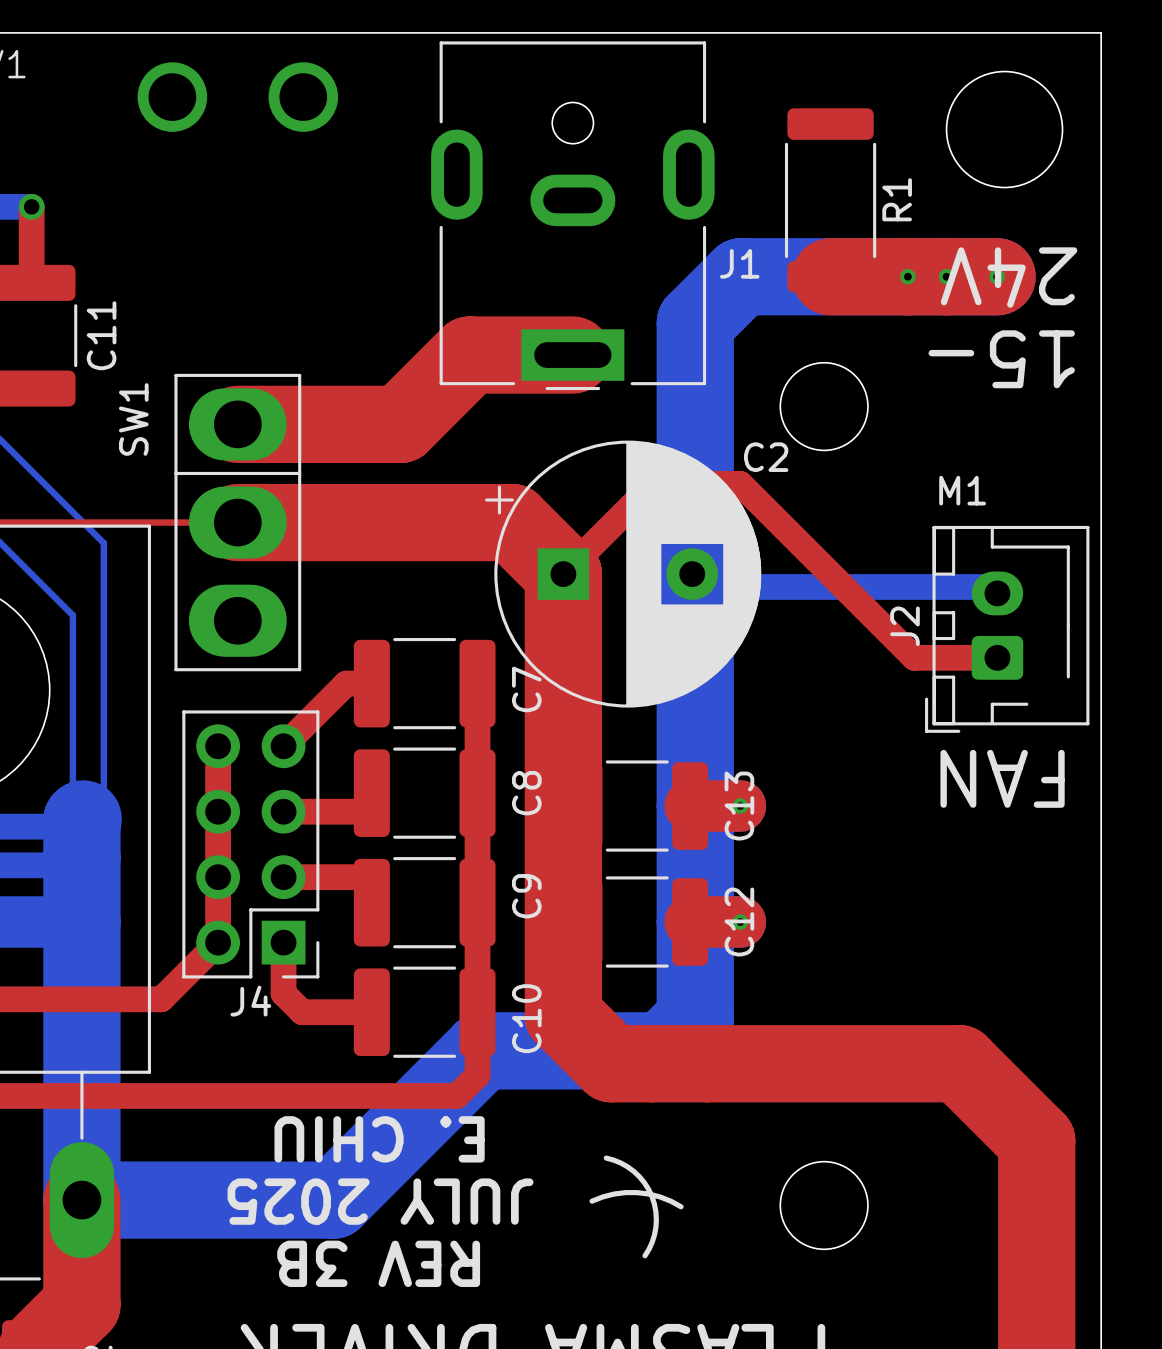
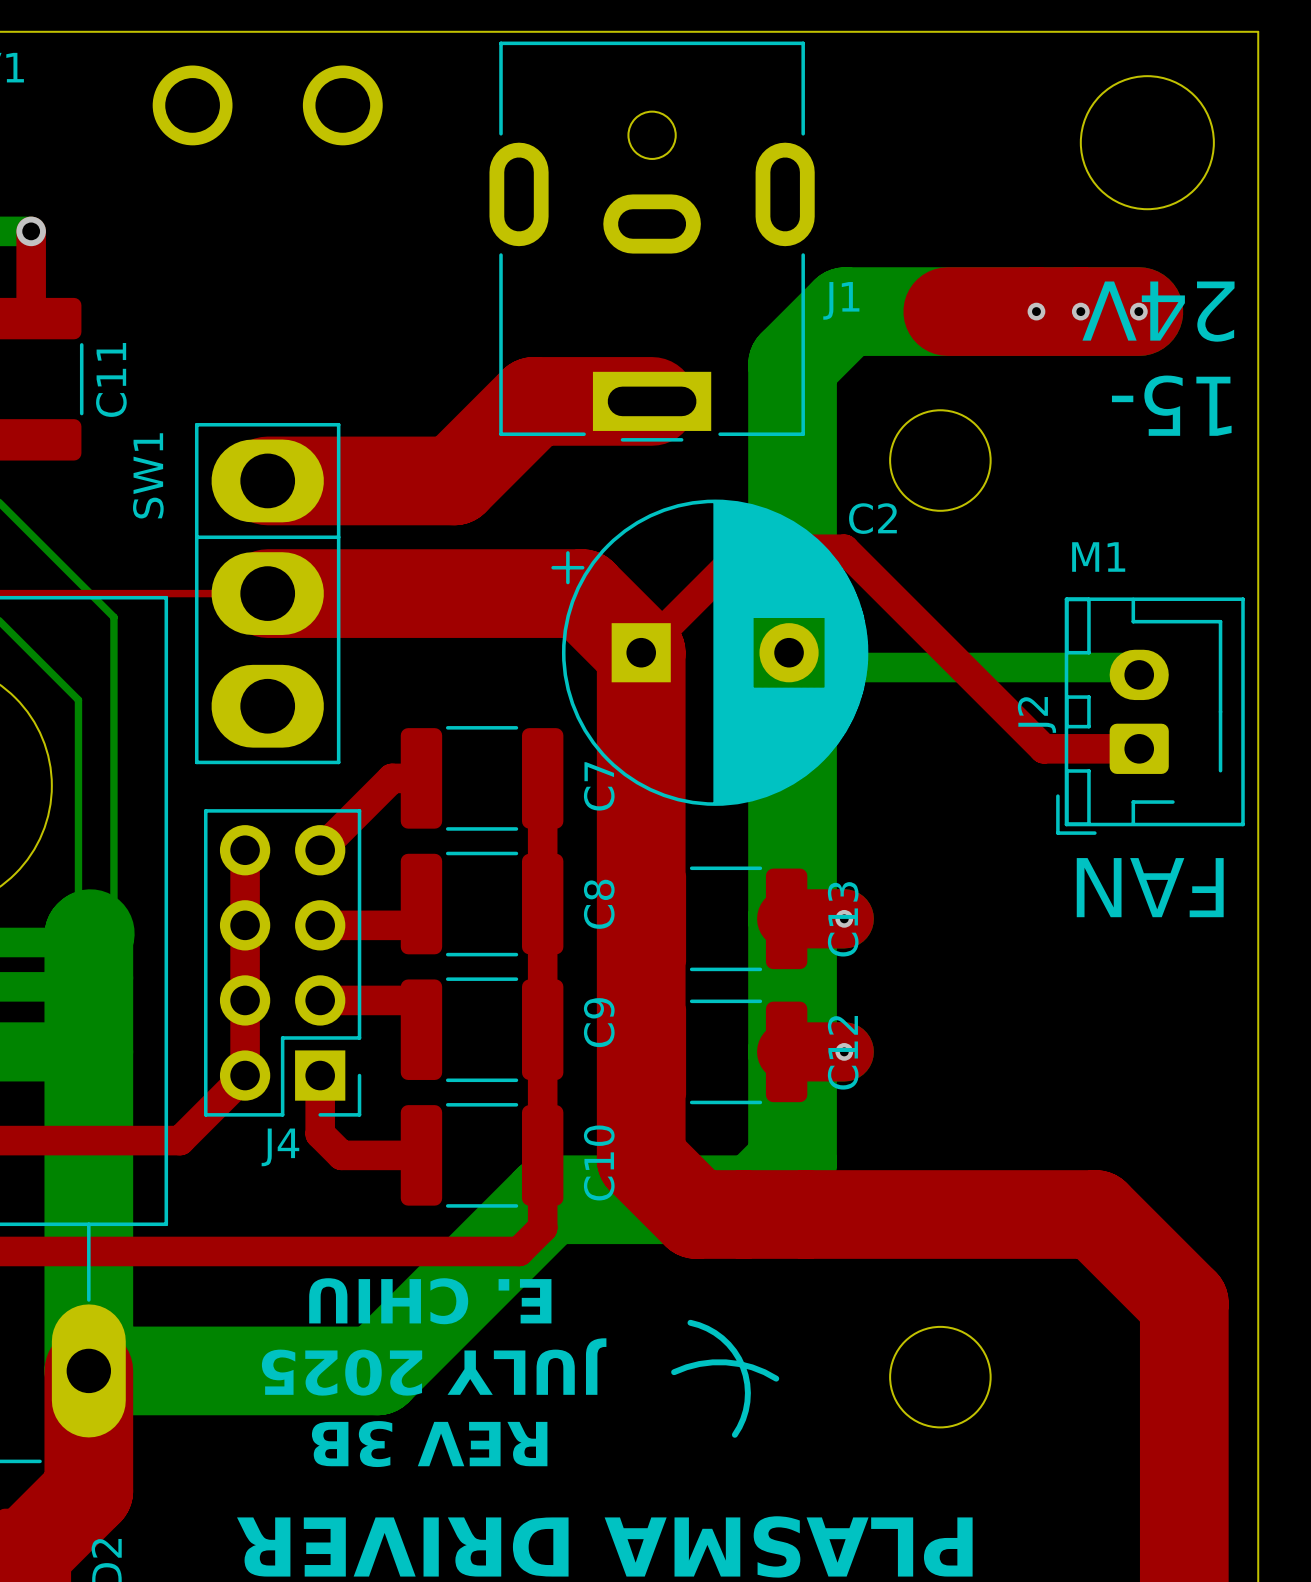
R1: (830, 200) -> none

